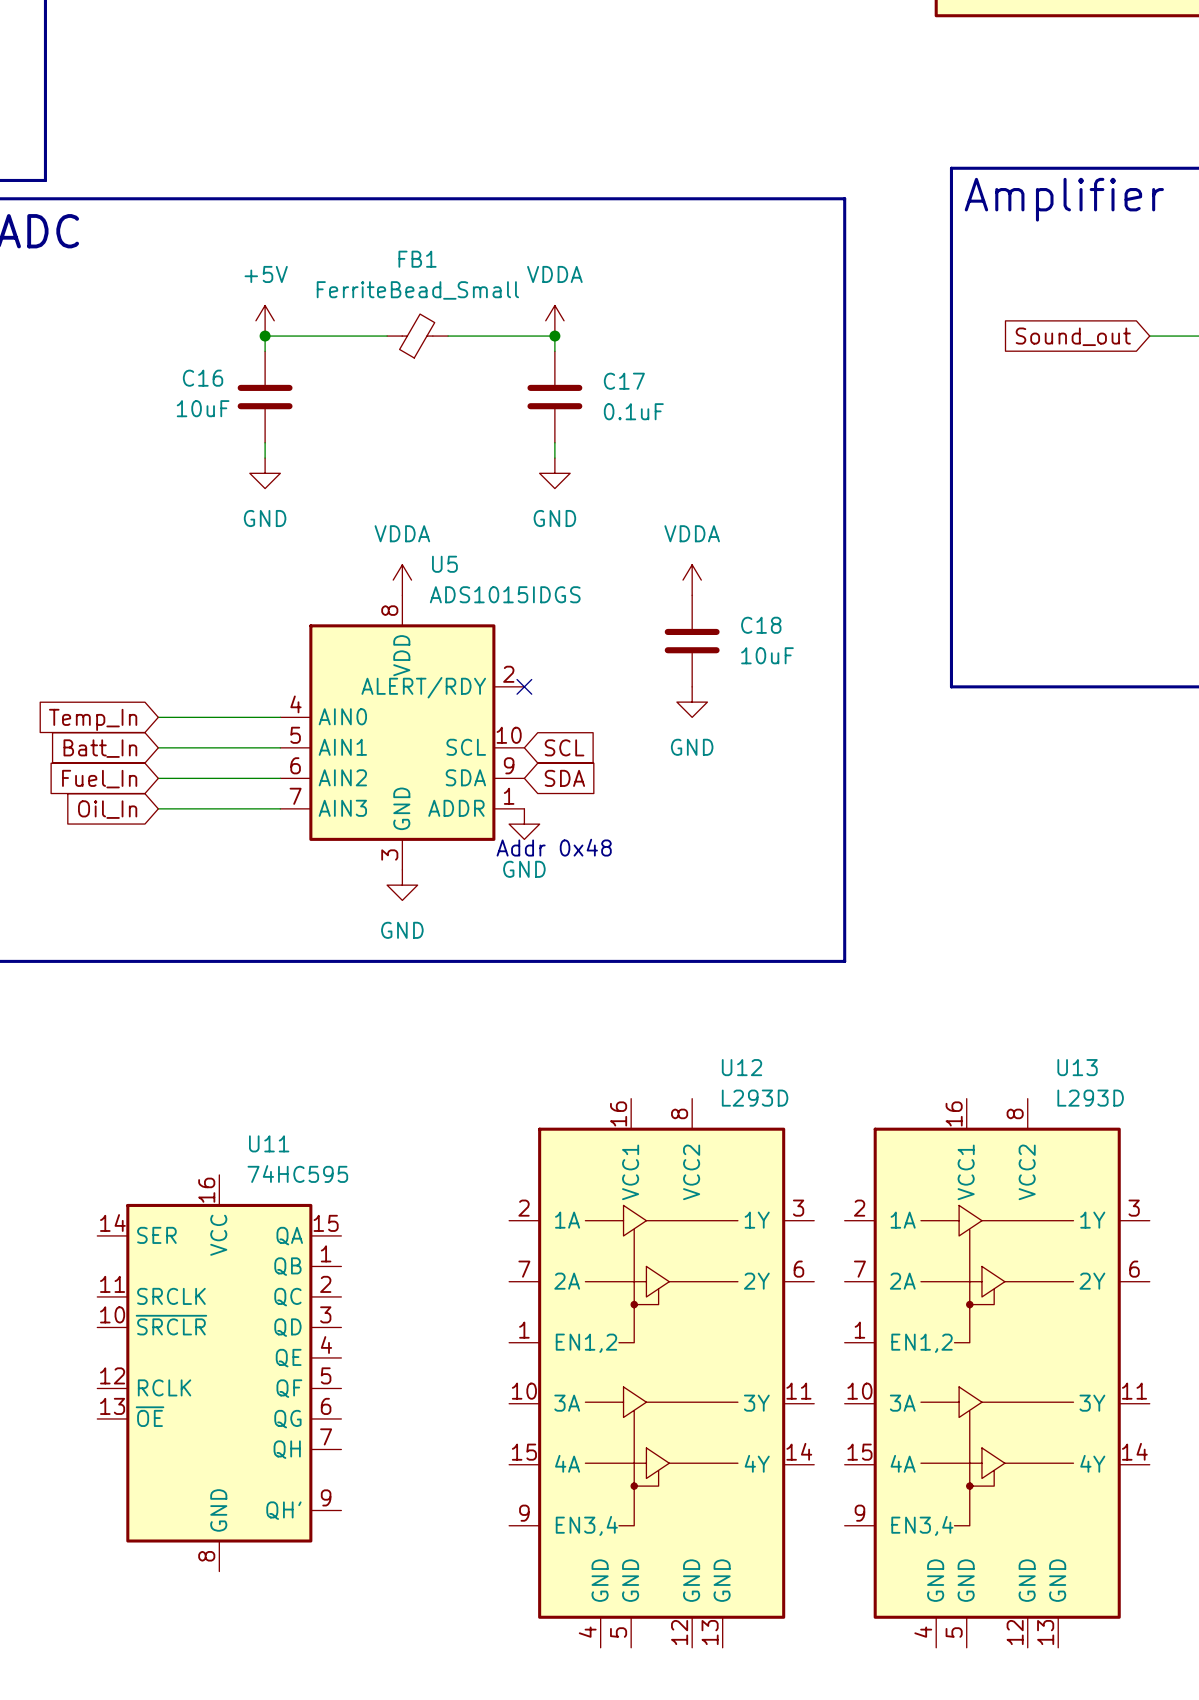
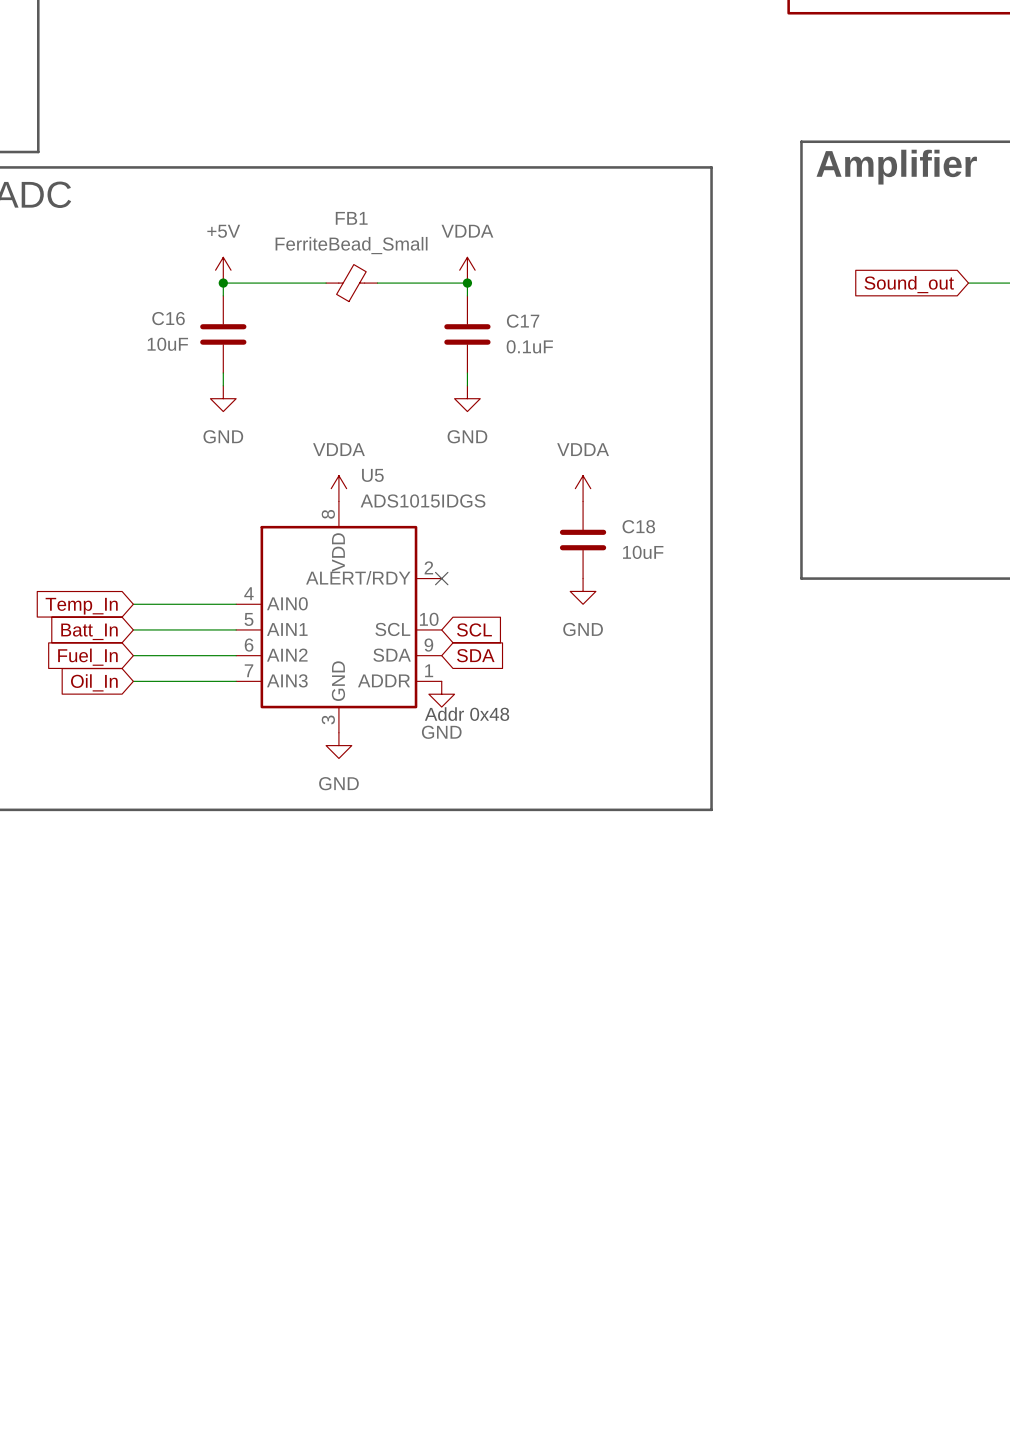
U11: 74HC595 (219, 1373) -> none
U12: L293D (661, 1373) -> none
U13: L293D (997, 1373) -> none

